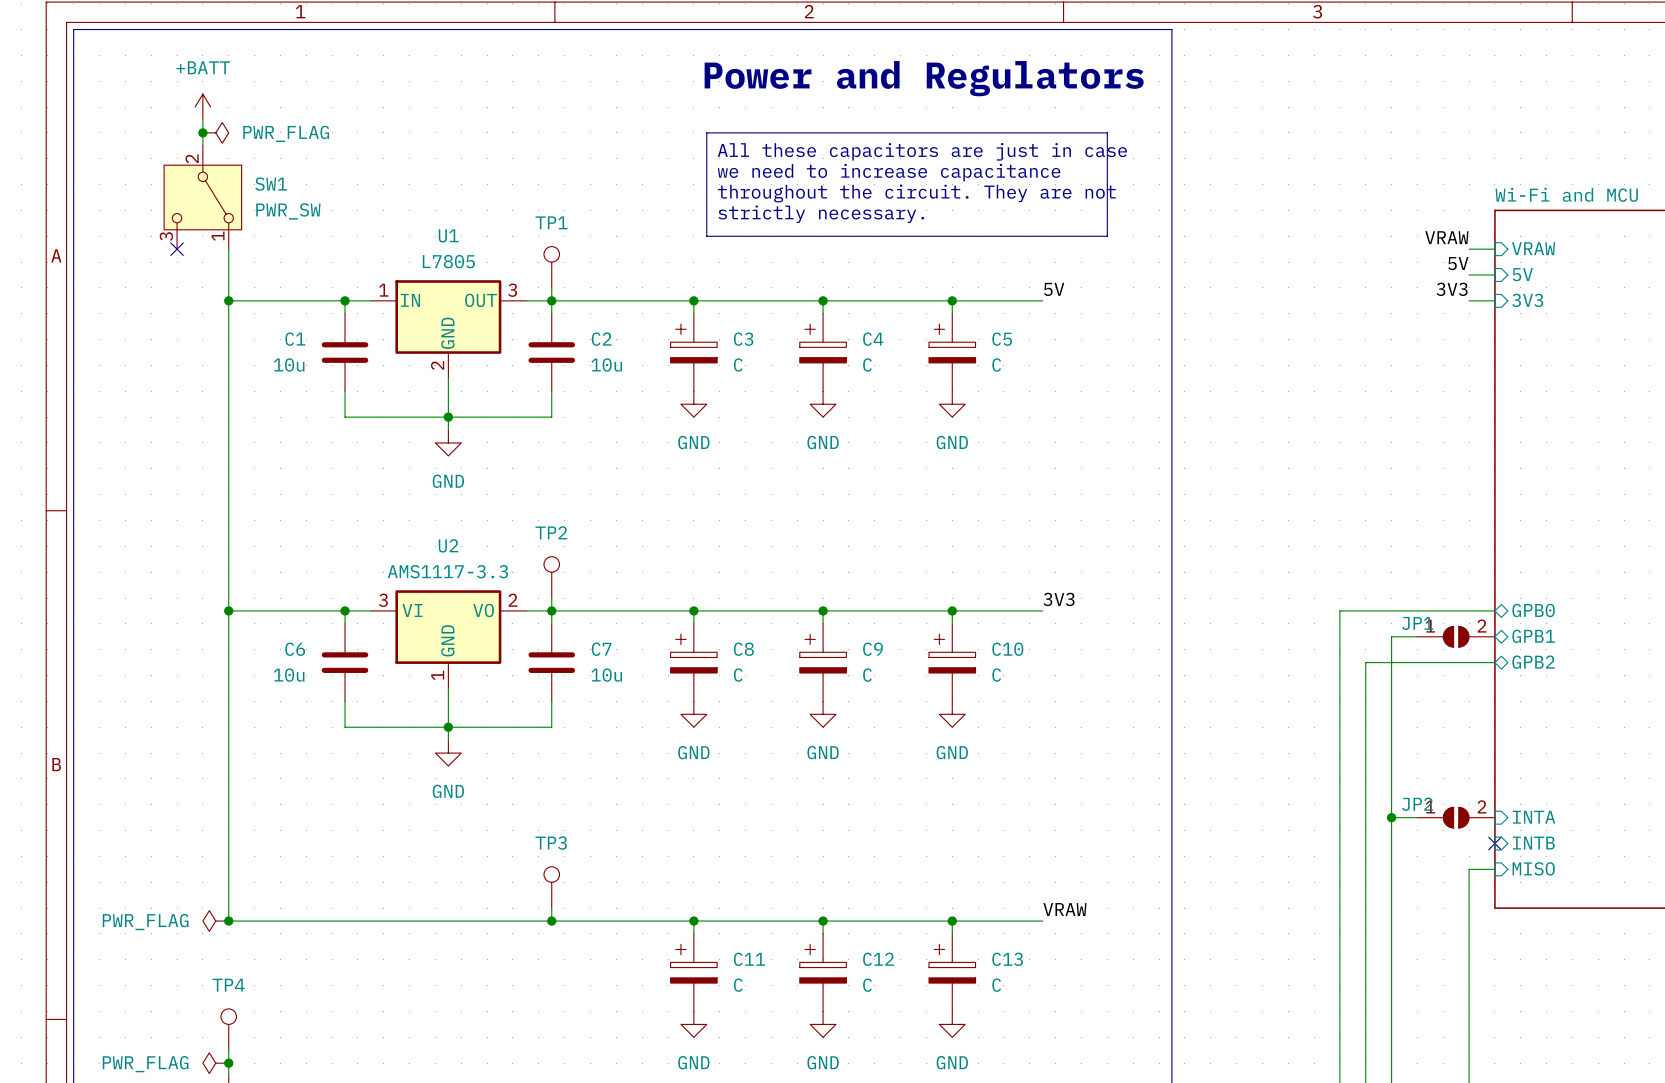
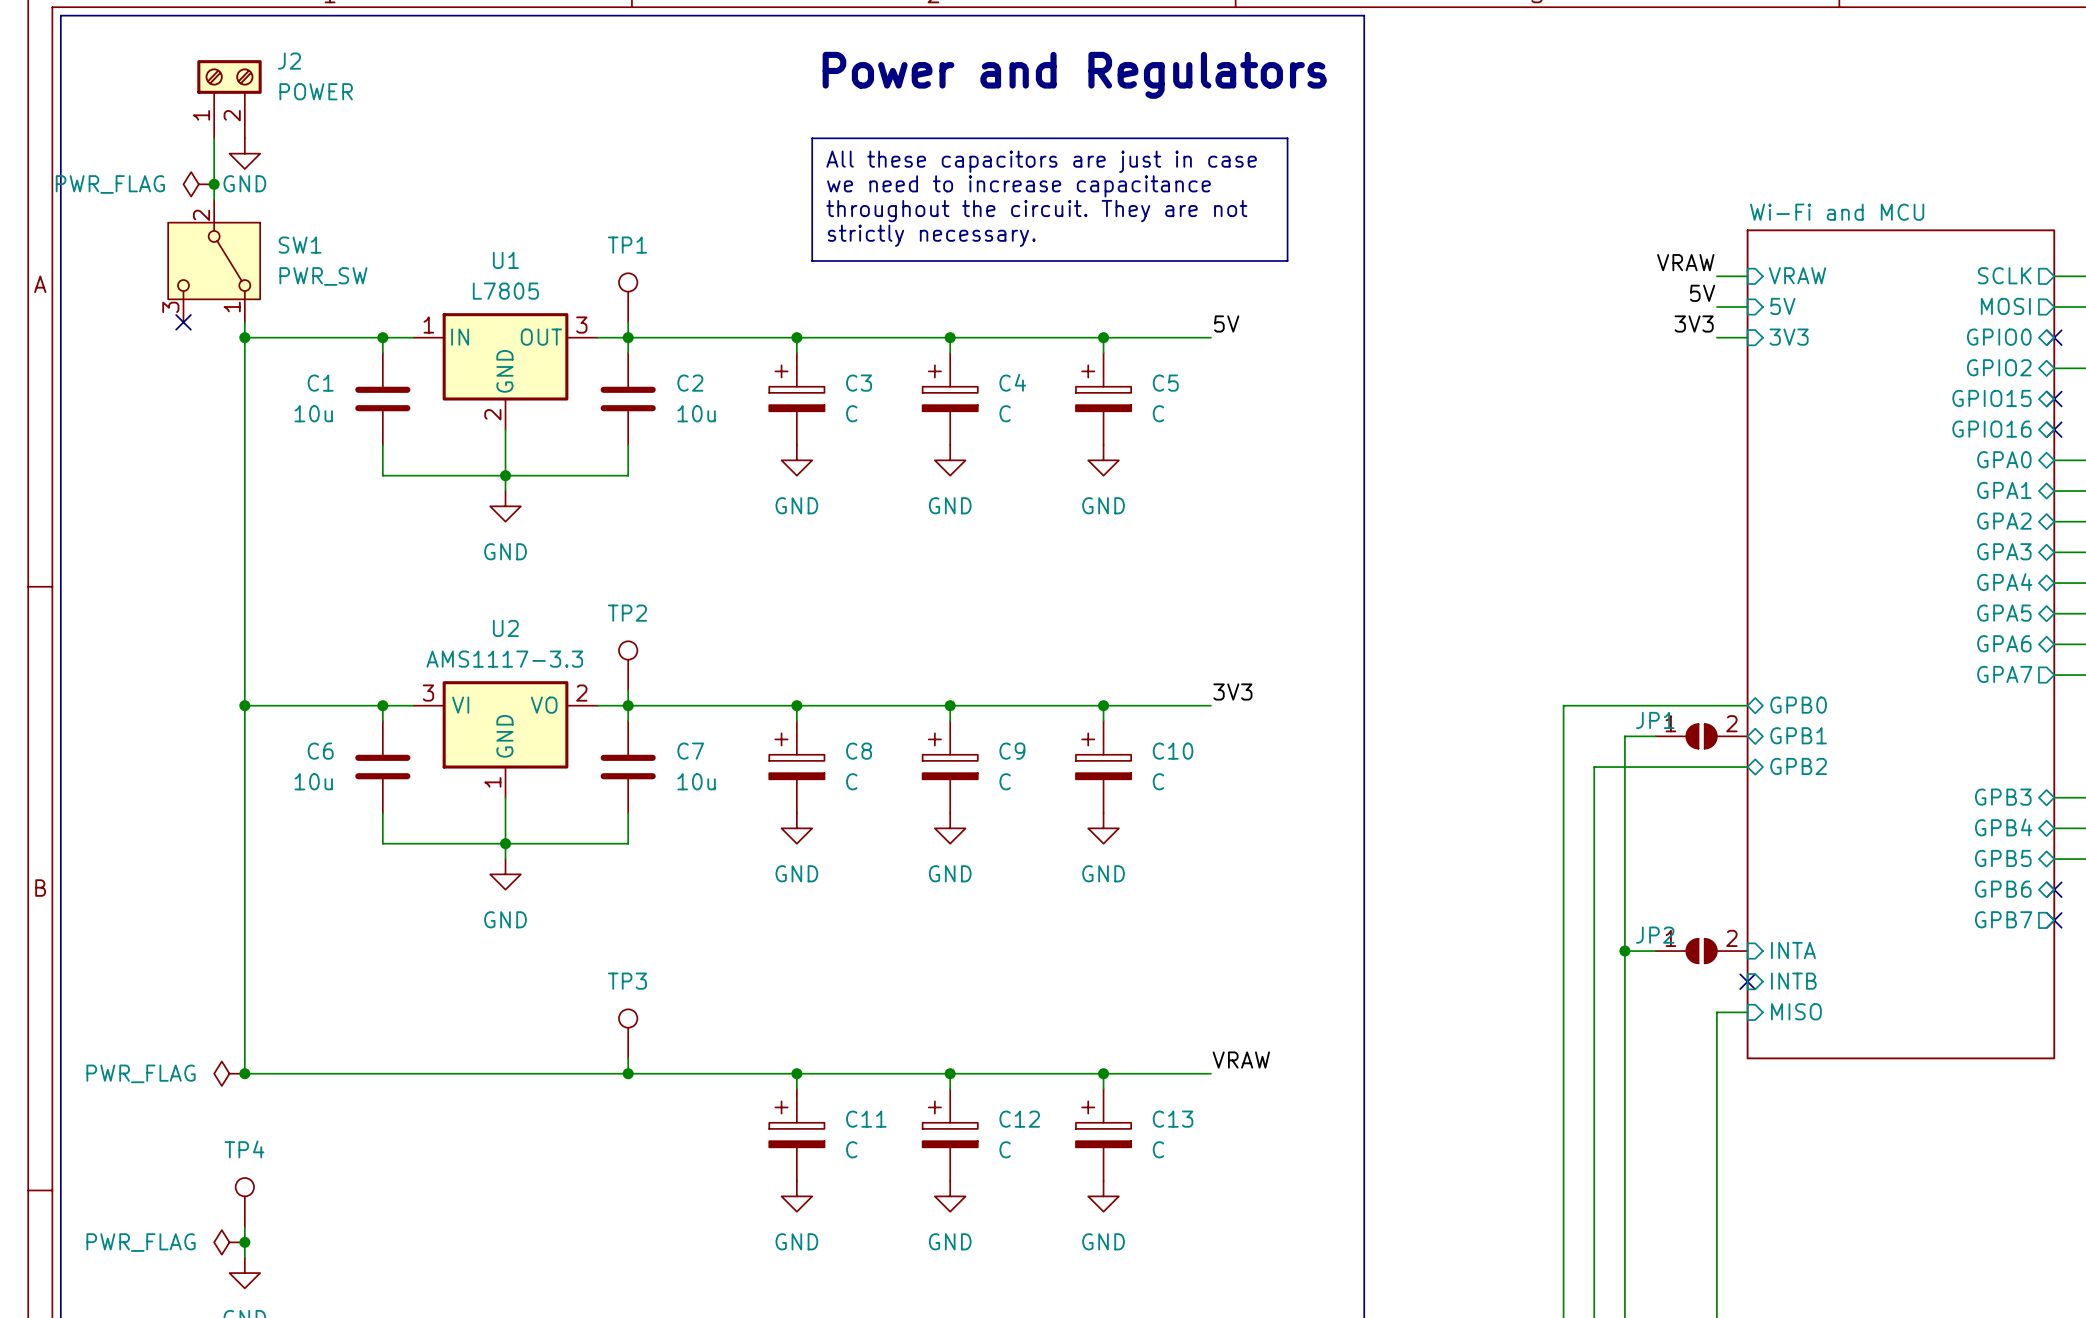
J2: none -> POWER (229, 99)
power symbol: +BATT (202, 107) -> none
junction position: (202, 132) -> (214, 184)
power symbol rotation: 0° (215, 132) -> 180° (198, 184)
power symbol position: PWR_FLAG (215, 132) -> PWR_FLAG (198, 184)
power symbol: none -> GND (244, 153)
SW1 position: (202, 197) -> (214, 261)
no-connect mark position: (177, 249) -> (183, 322)

